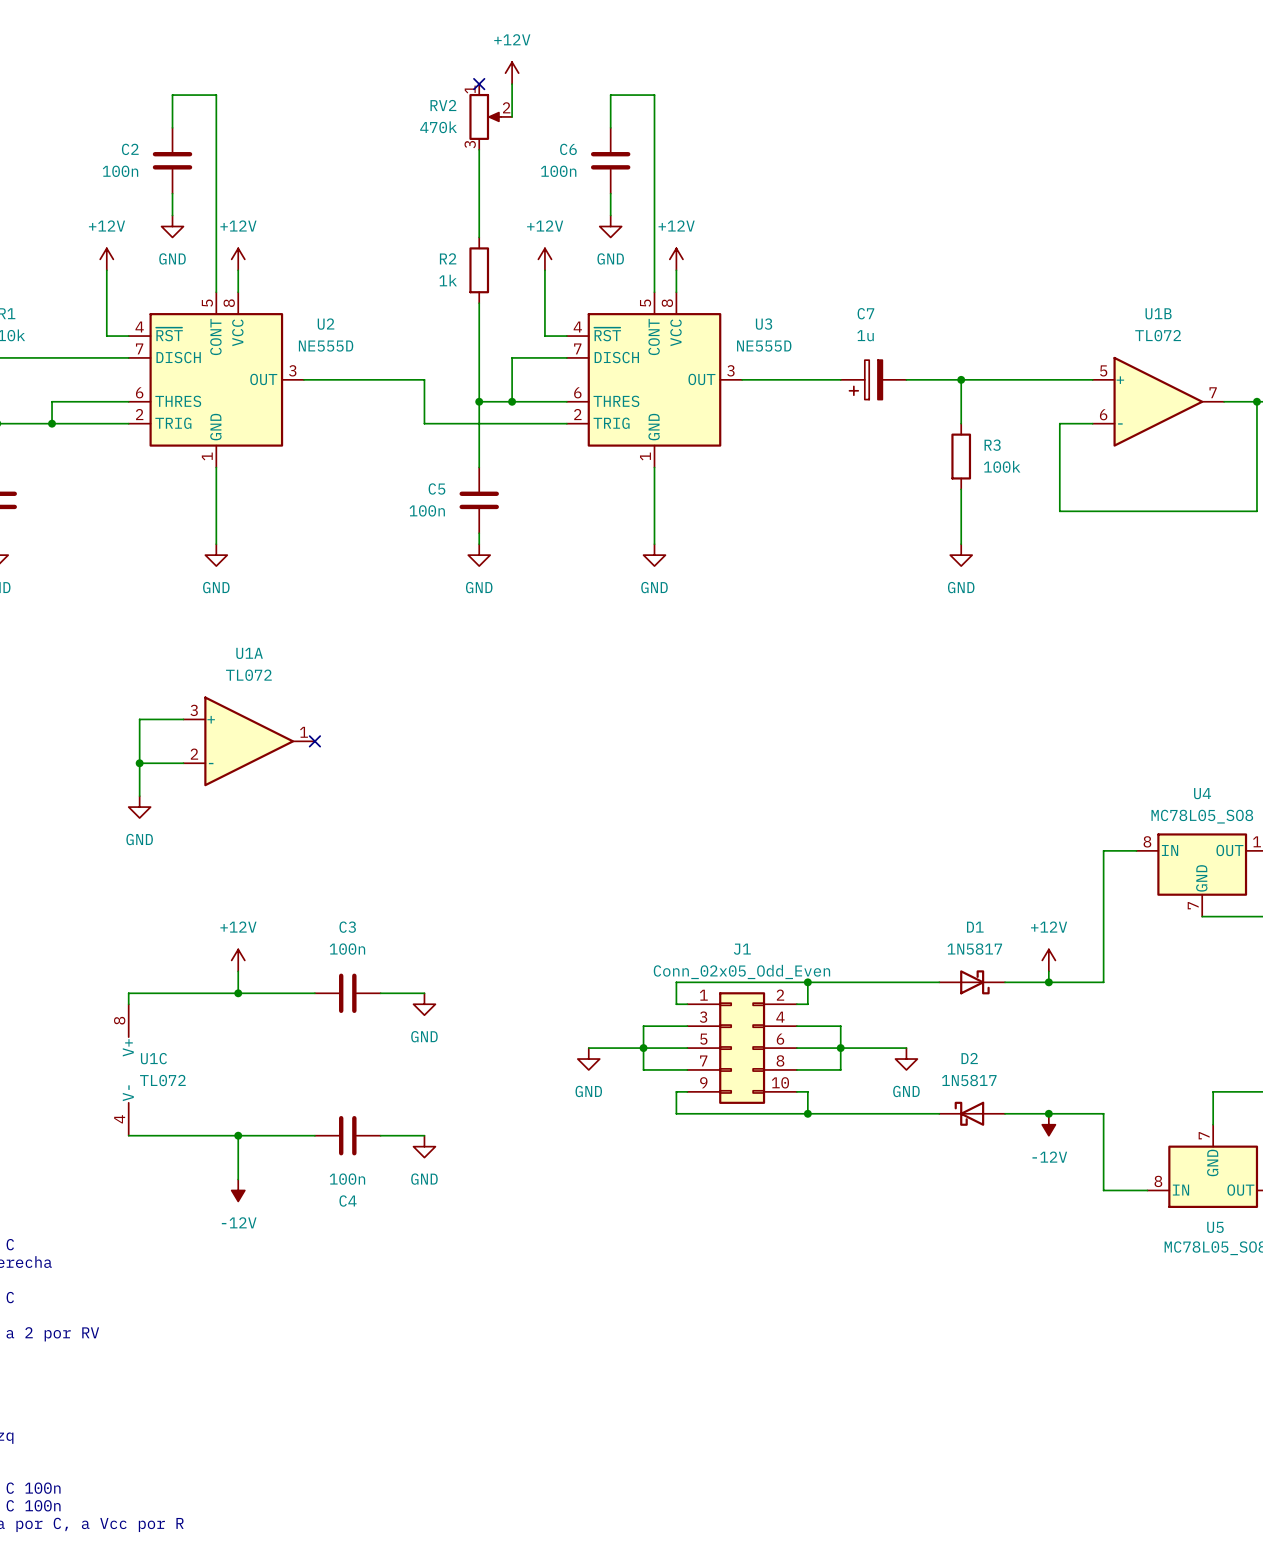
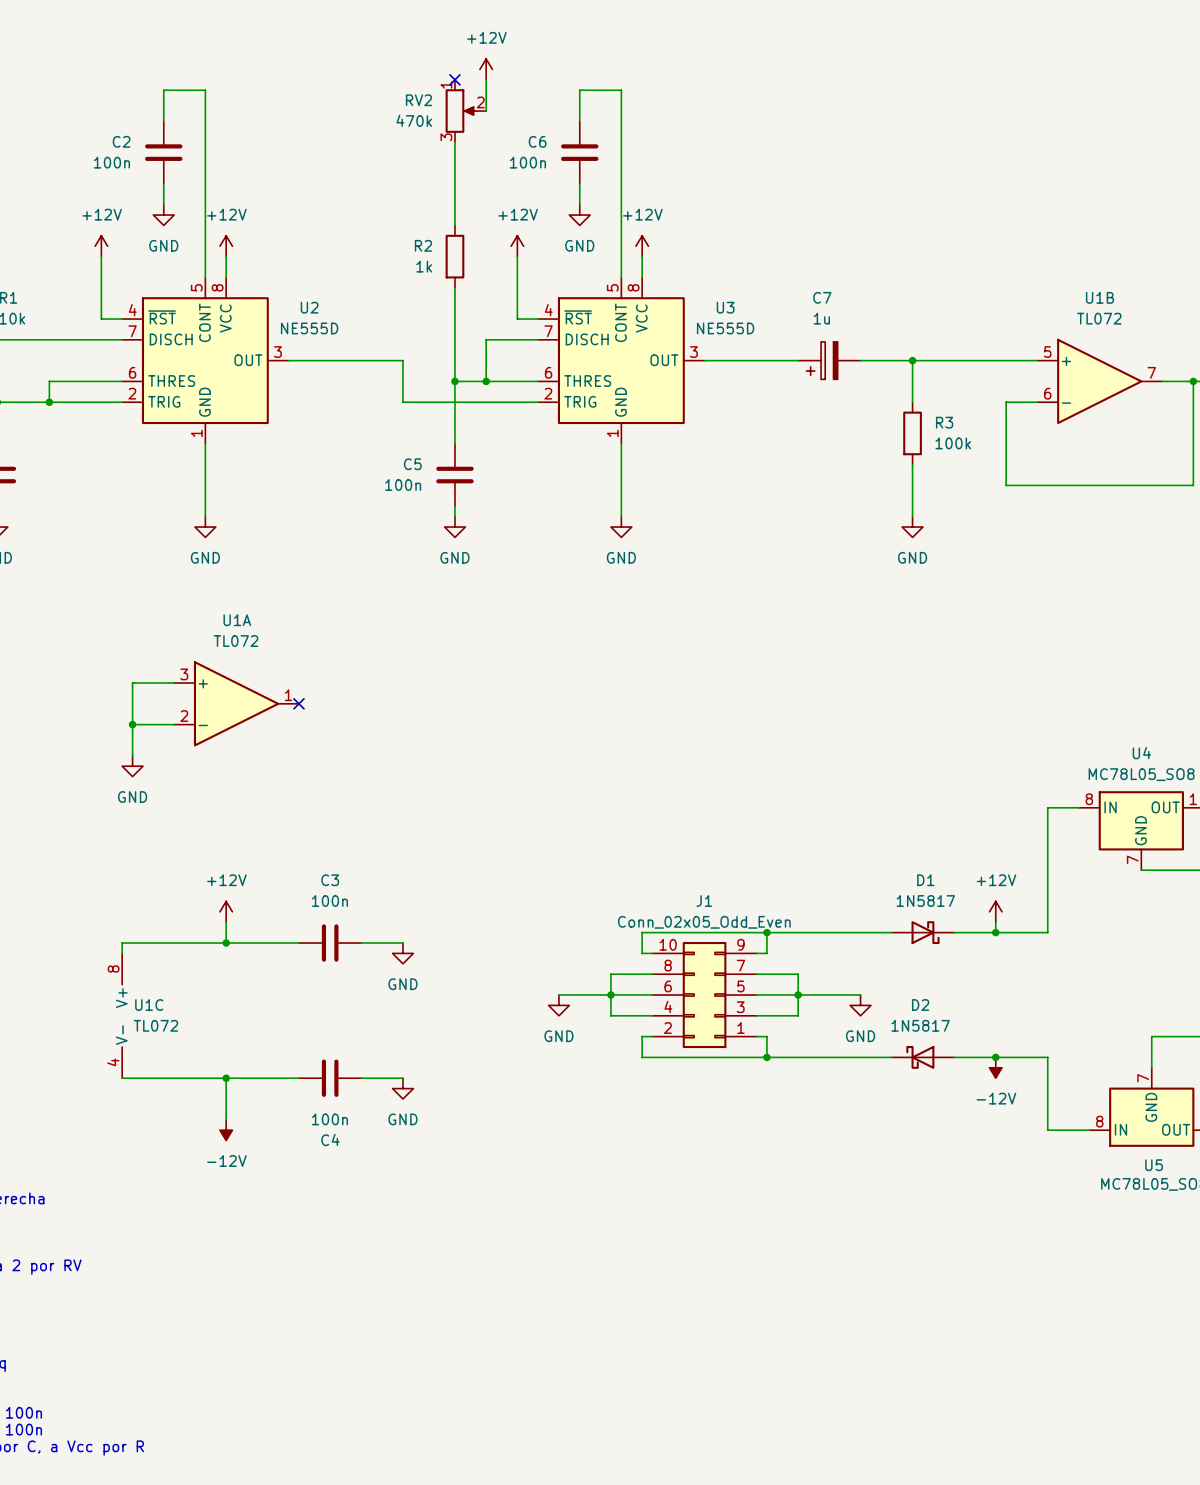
J1 rotation: 0° (742, 1048) -> 180° (704, 995)

